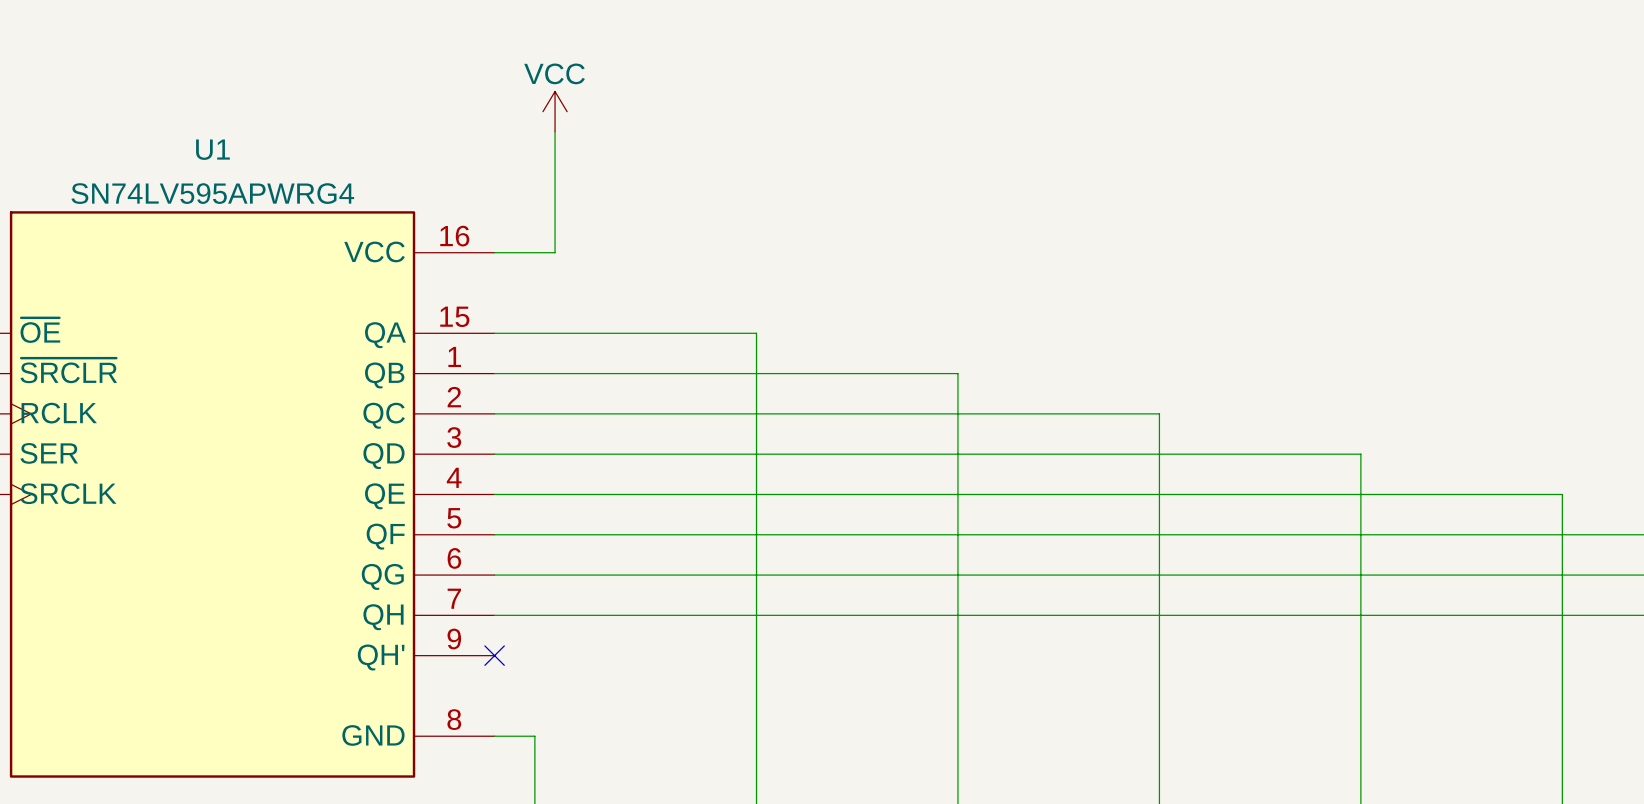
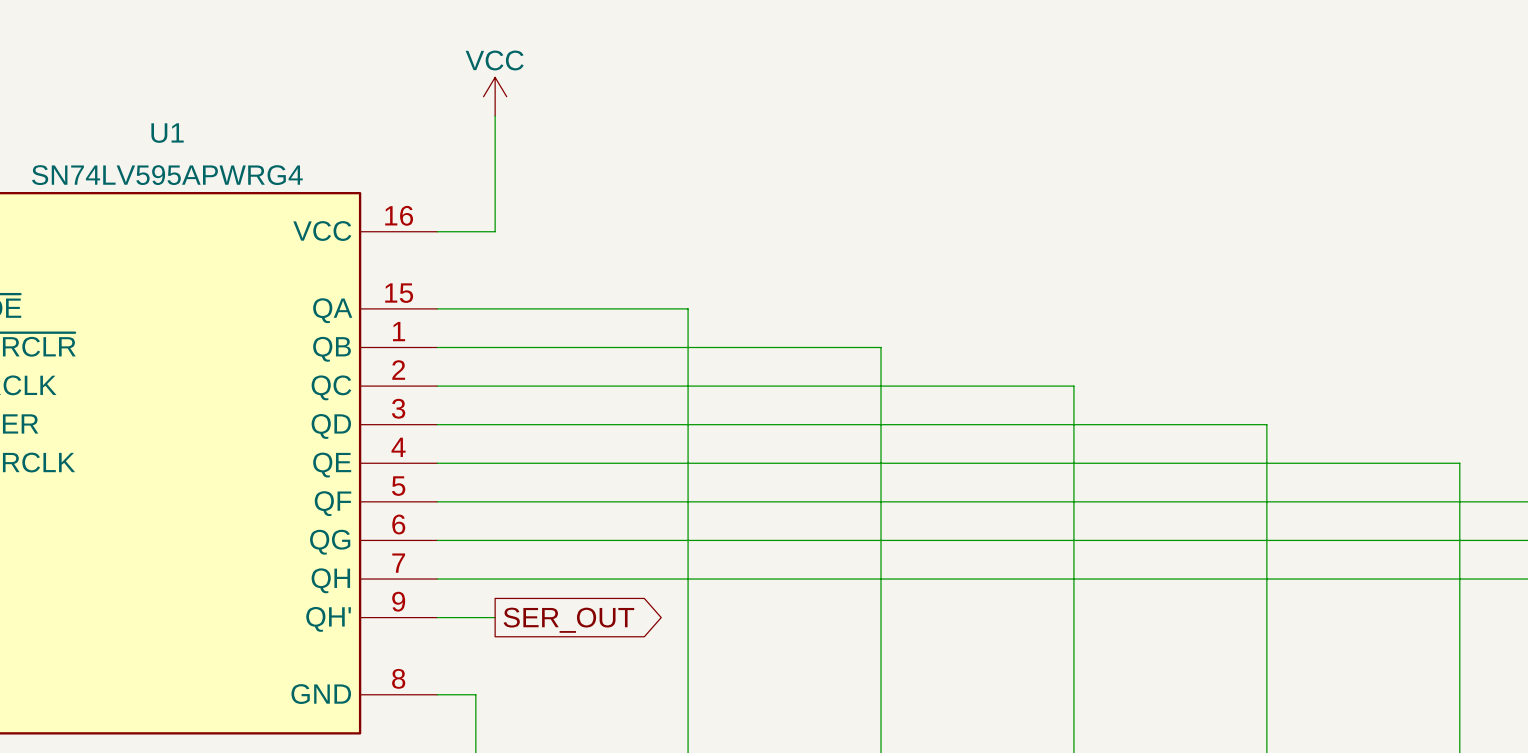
wire: none -> (437, 617) (495, 617)
no-connect mark: (494, 655) -> none
global label: none -> SER_OUT (568, 620)

